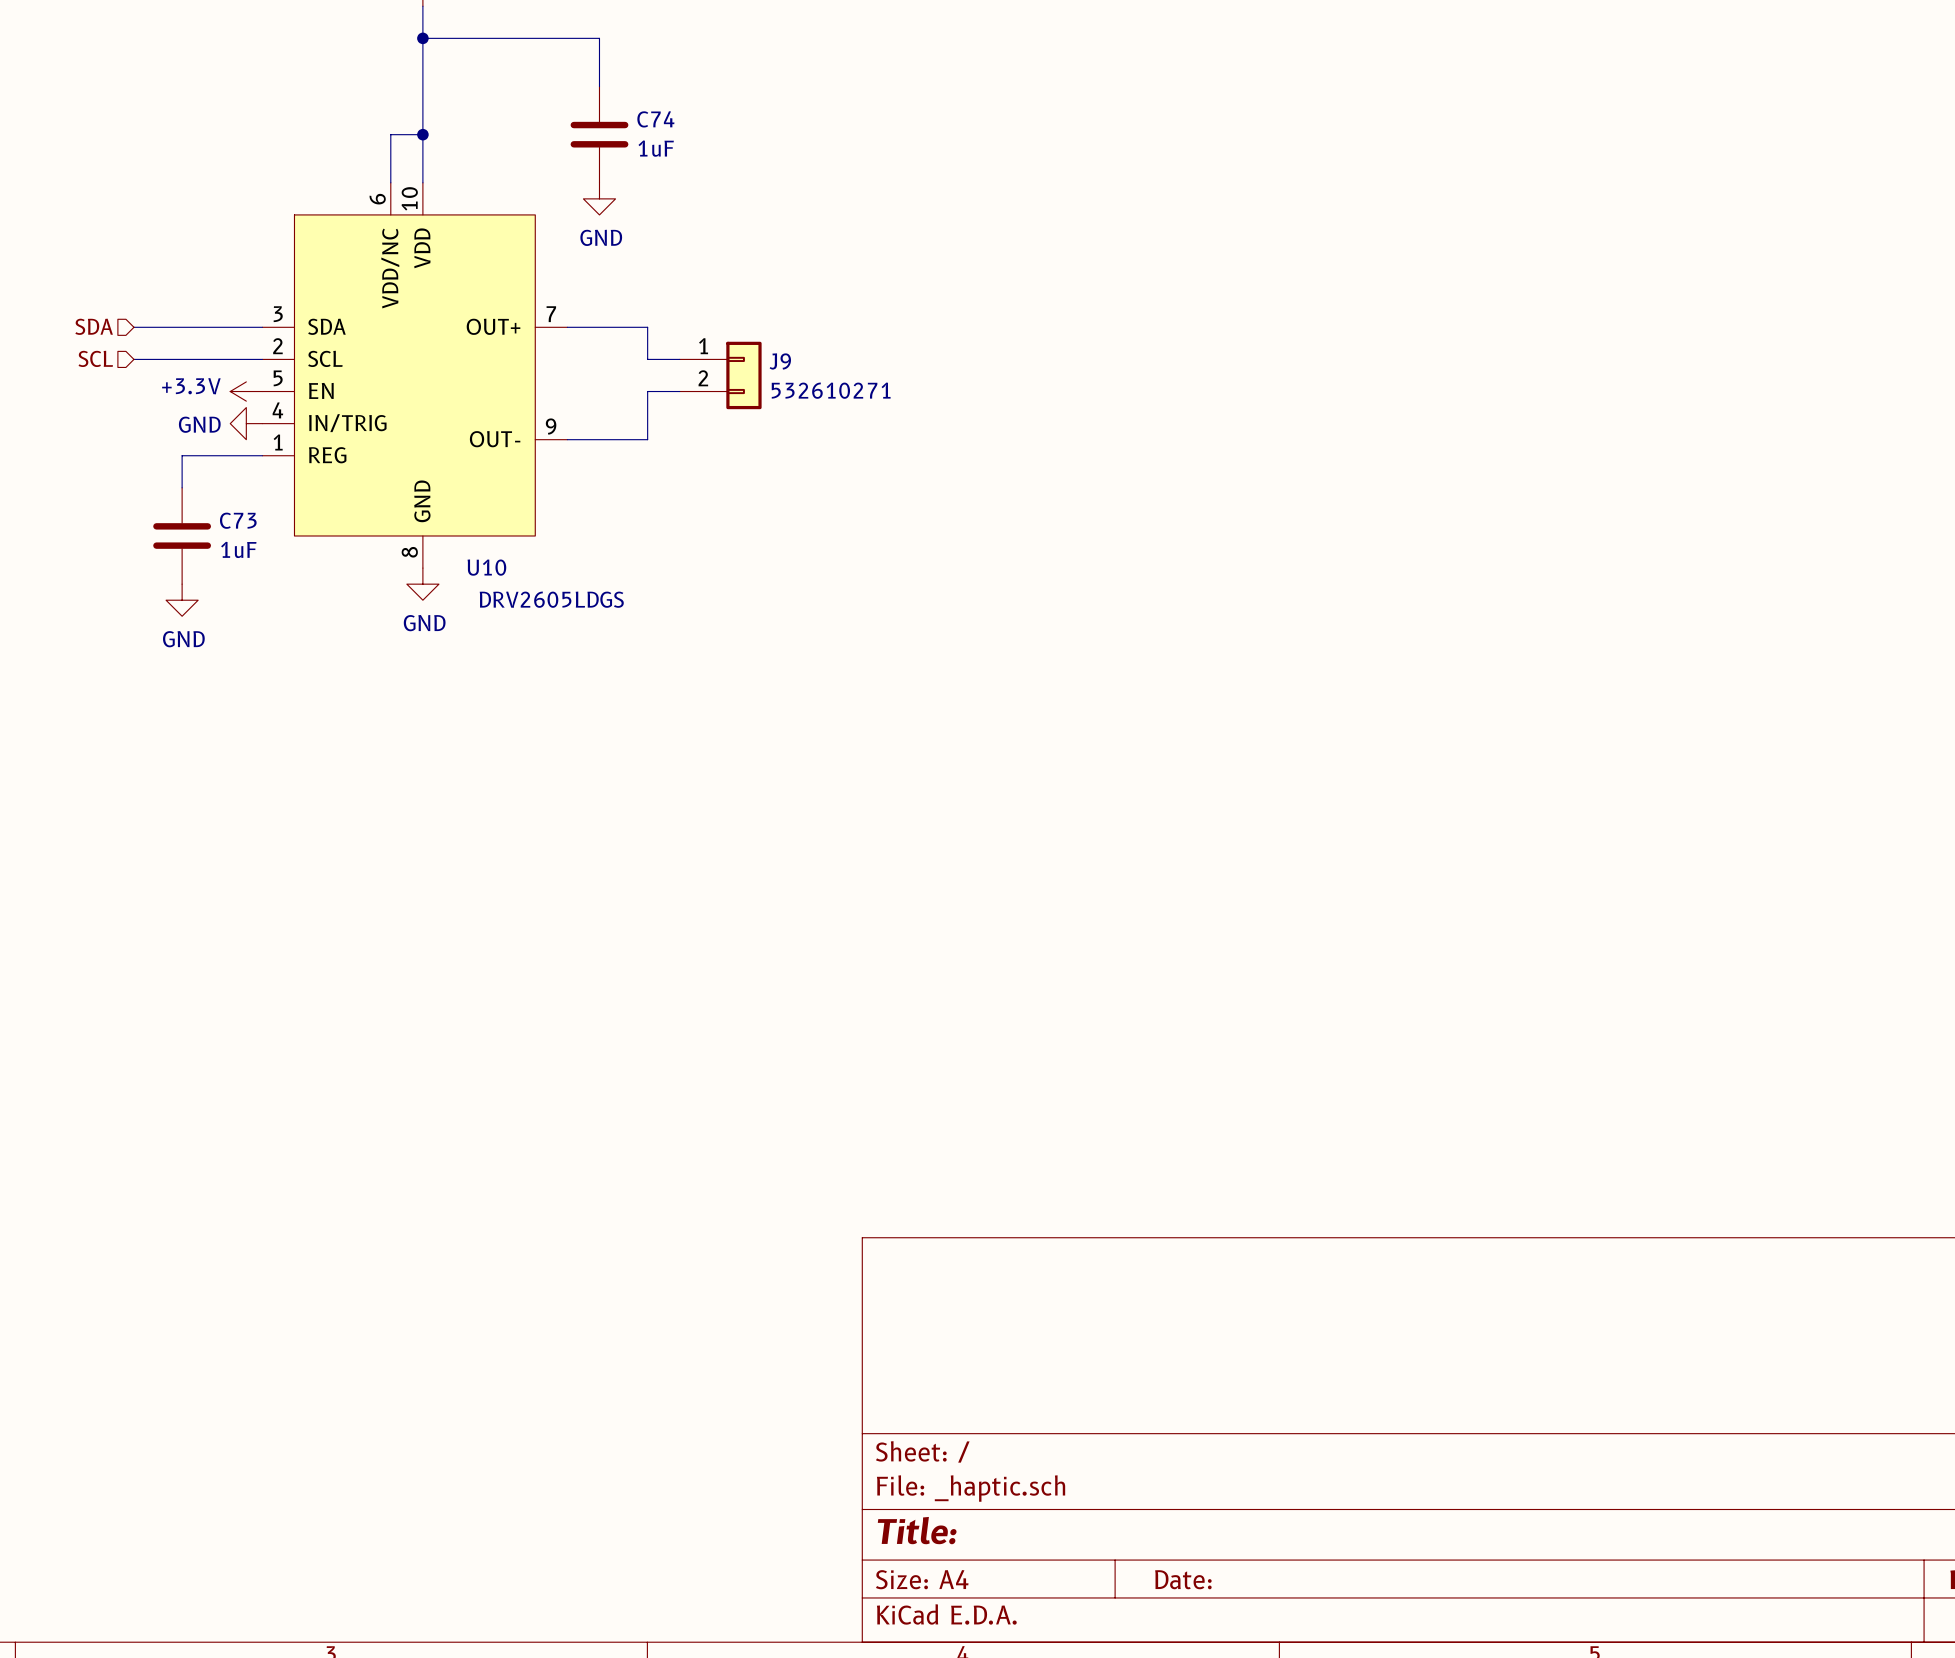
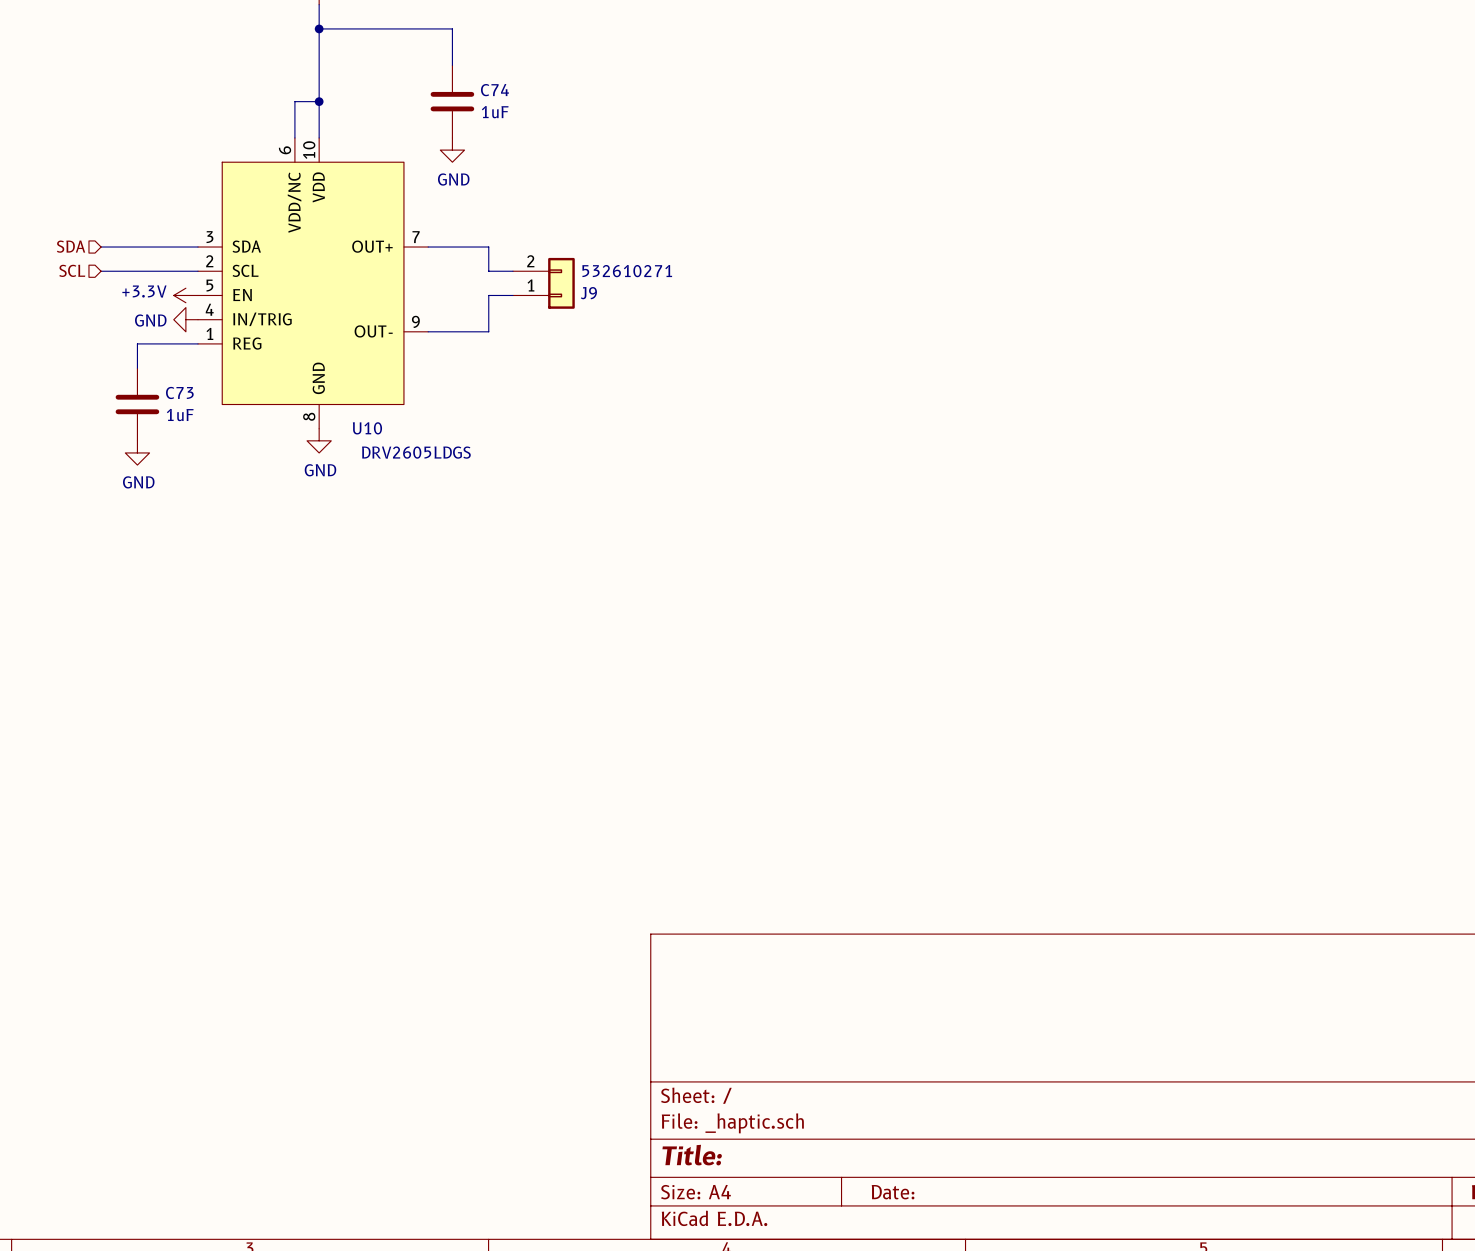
J9 flip: as is (743, 375) -> up-down (561, 283)

